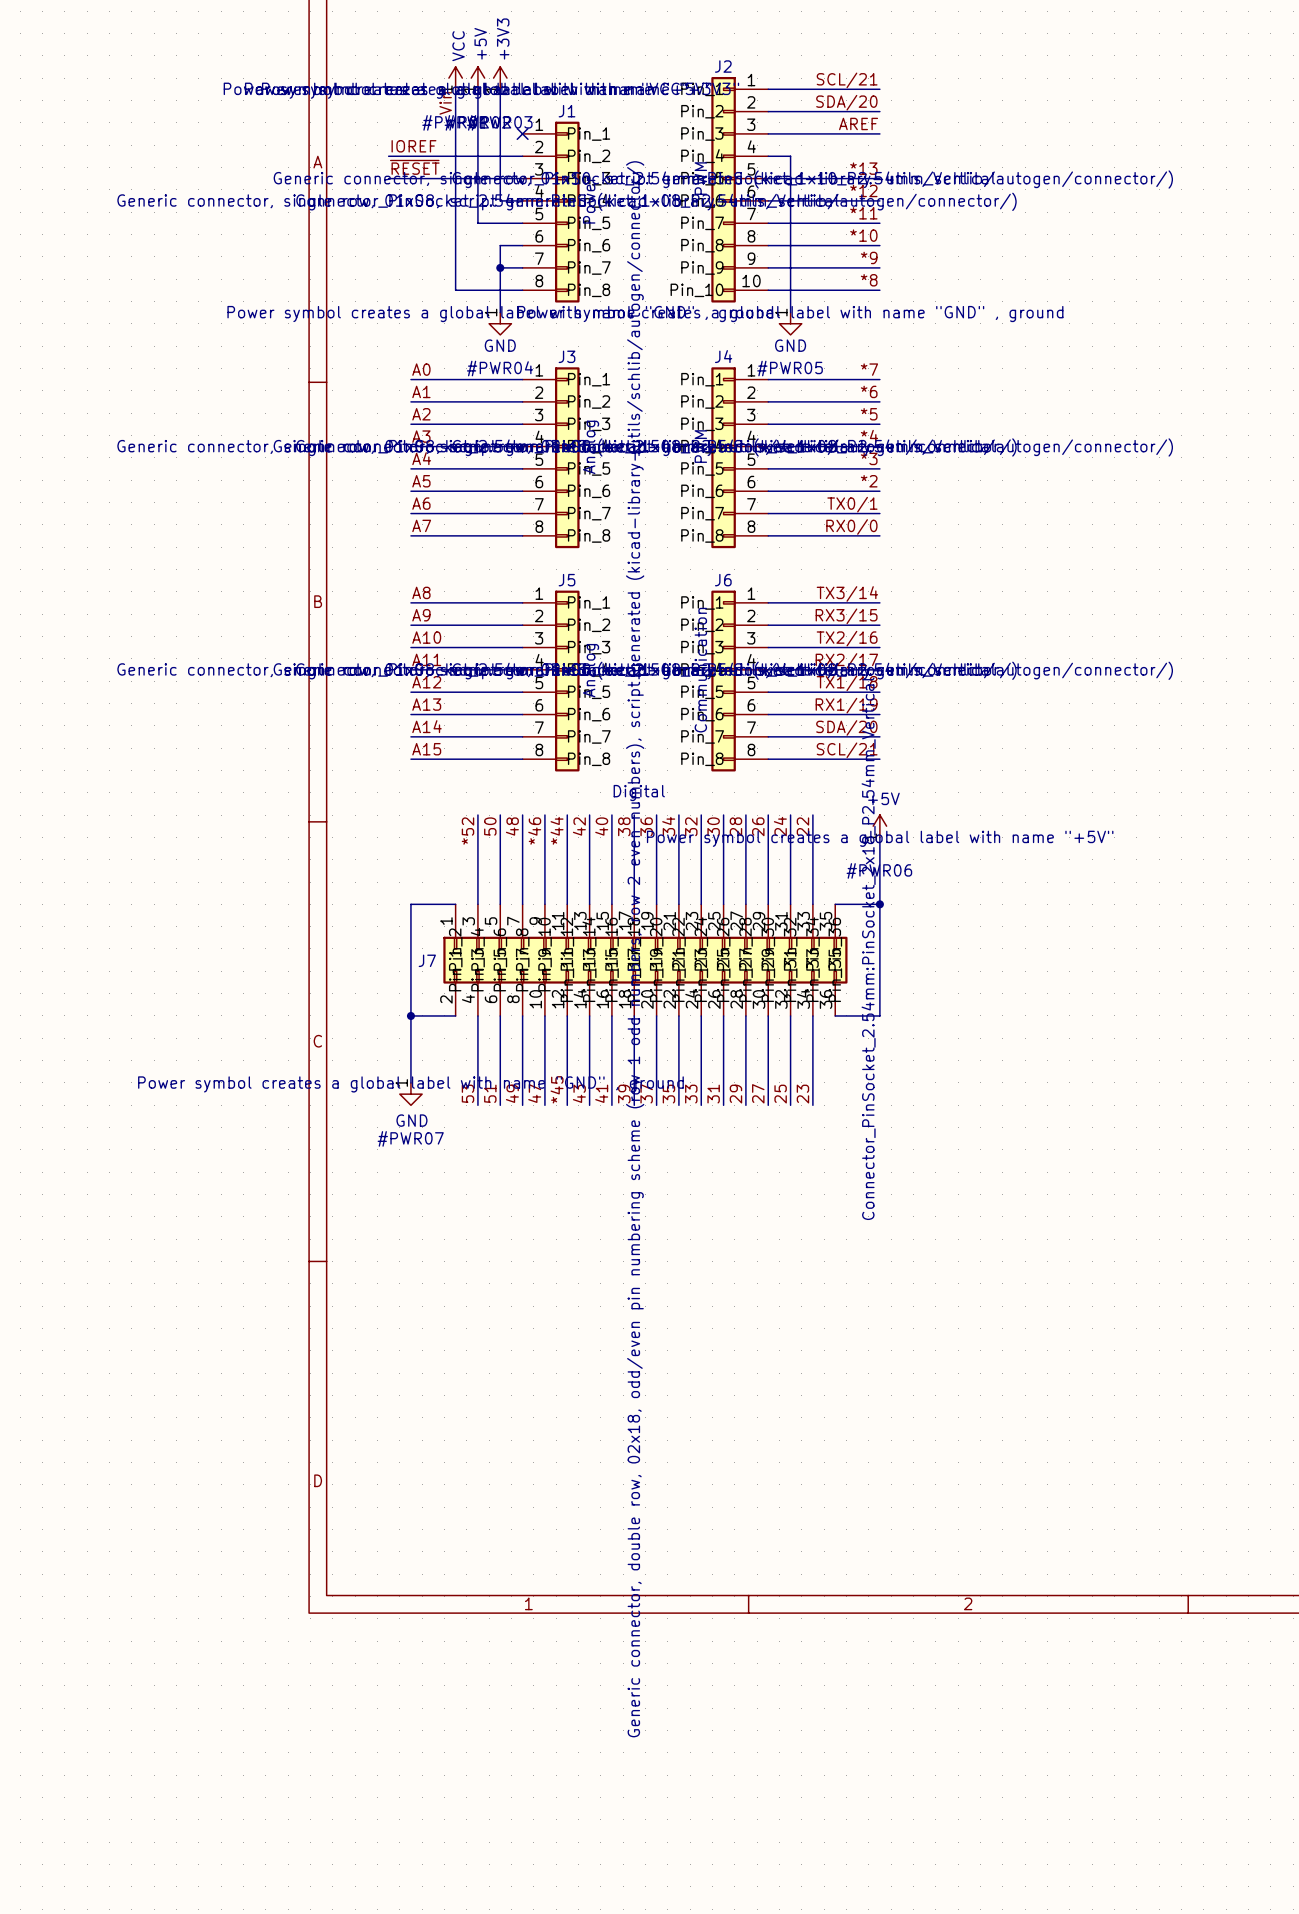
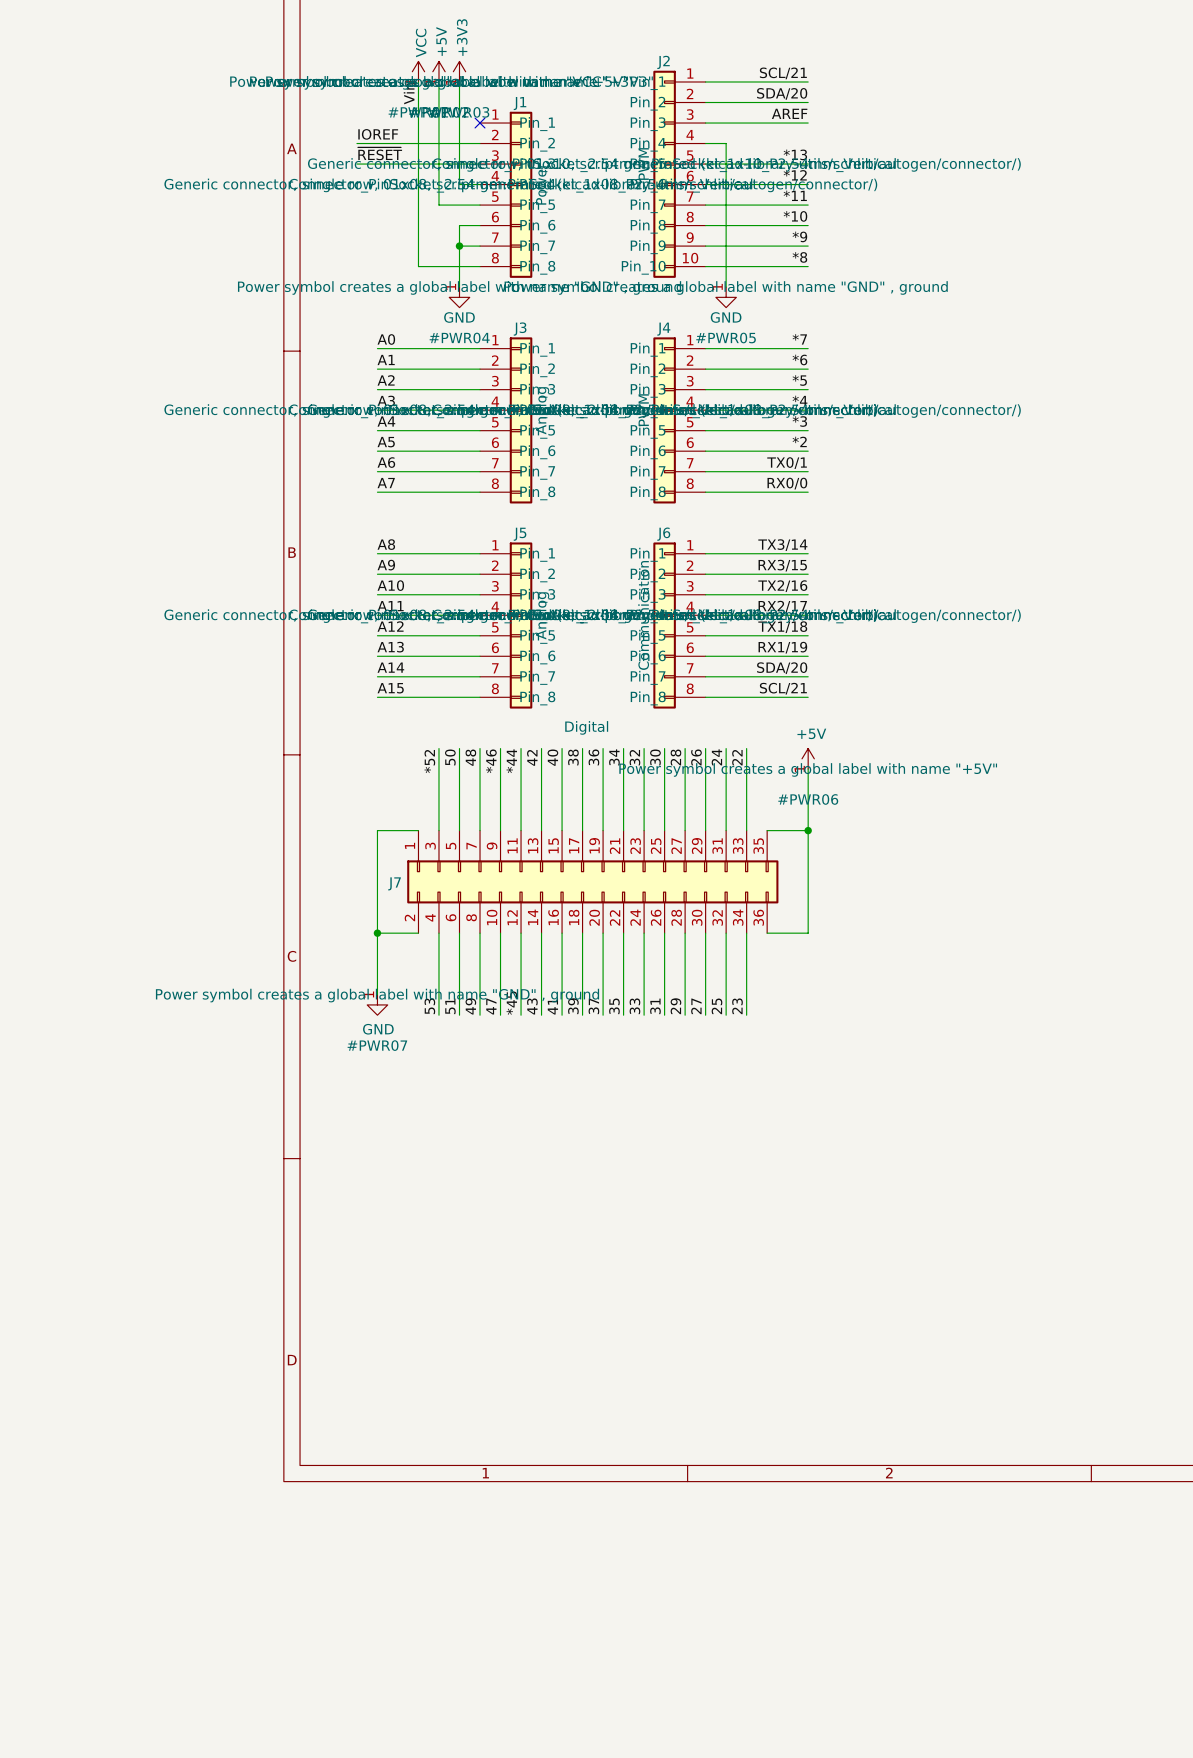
J7 symbol: [443, 904, 848, 1016] -> [407, 830, 779, 934]
J7 text: Connector_PinSocket_2.54mm:PinSocket_2x18_P2.54mm_Vertical (868, 948) -> none
J7 text: Generic connector, double row, 02x18, odd/even pin numbering scheme (row 1 odd numbers, row 2 even numbers), script generated (kicad-library-utils/schlib/autogen/connector/) (635, 949) -> none

